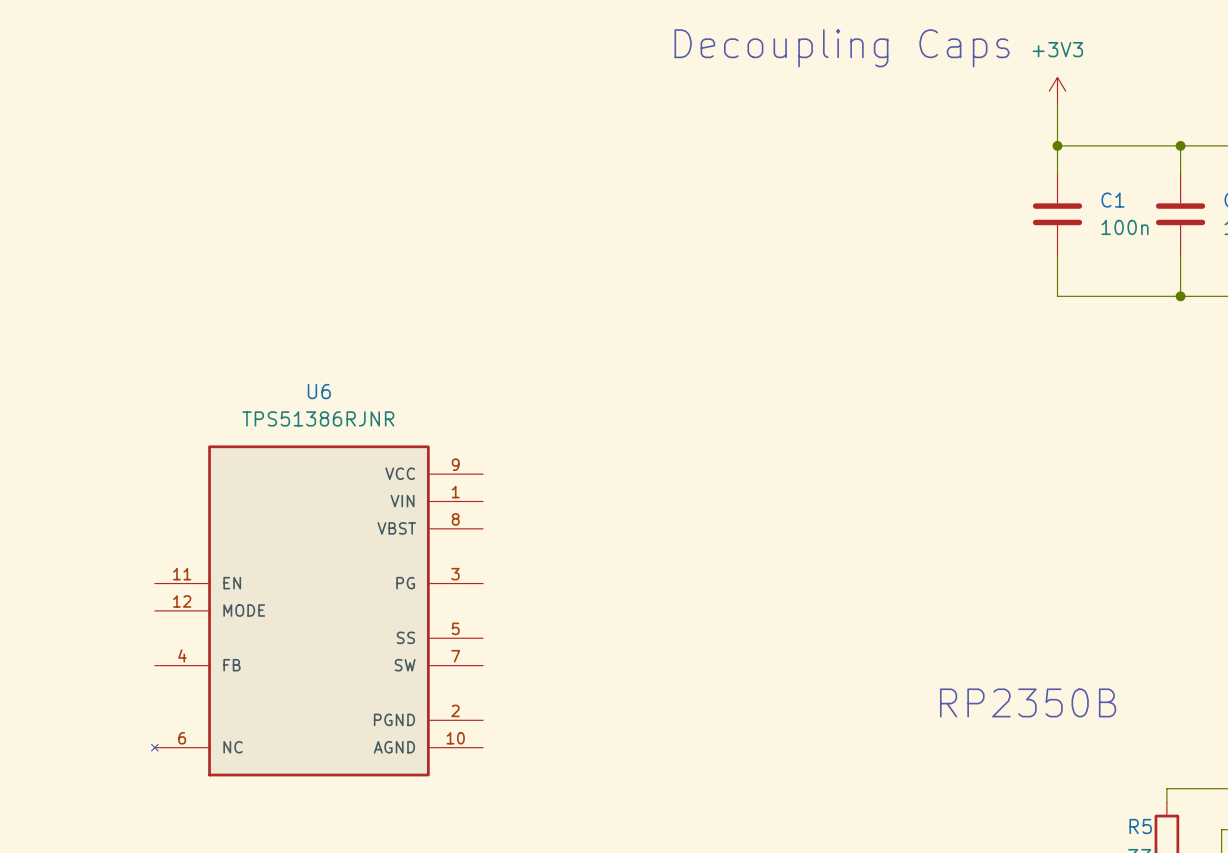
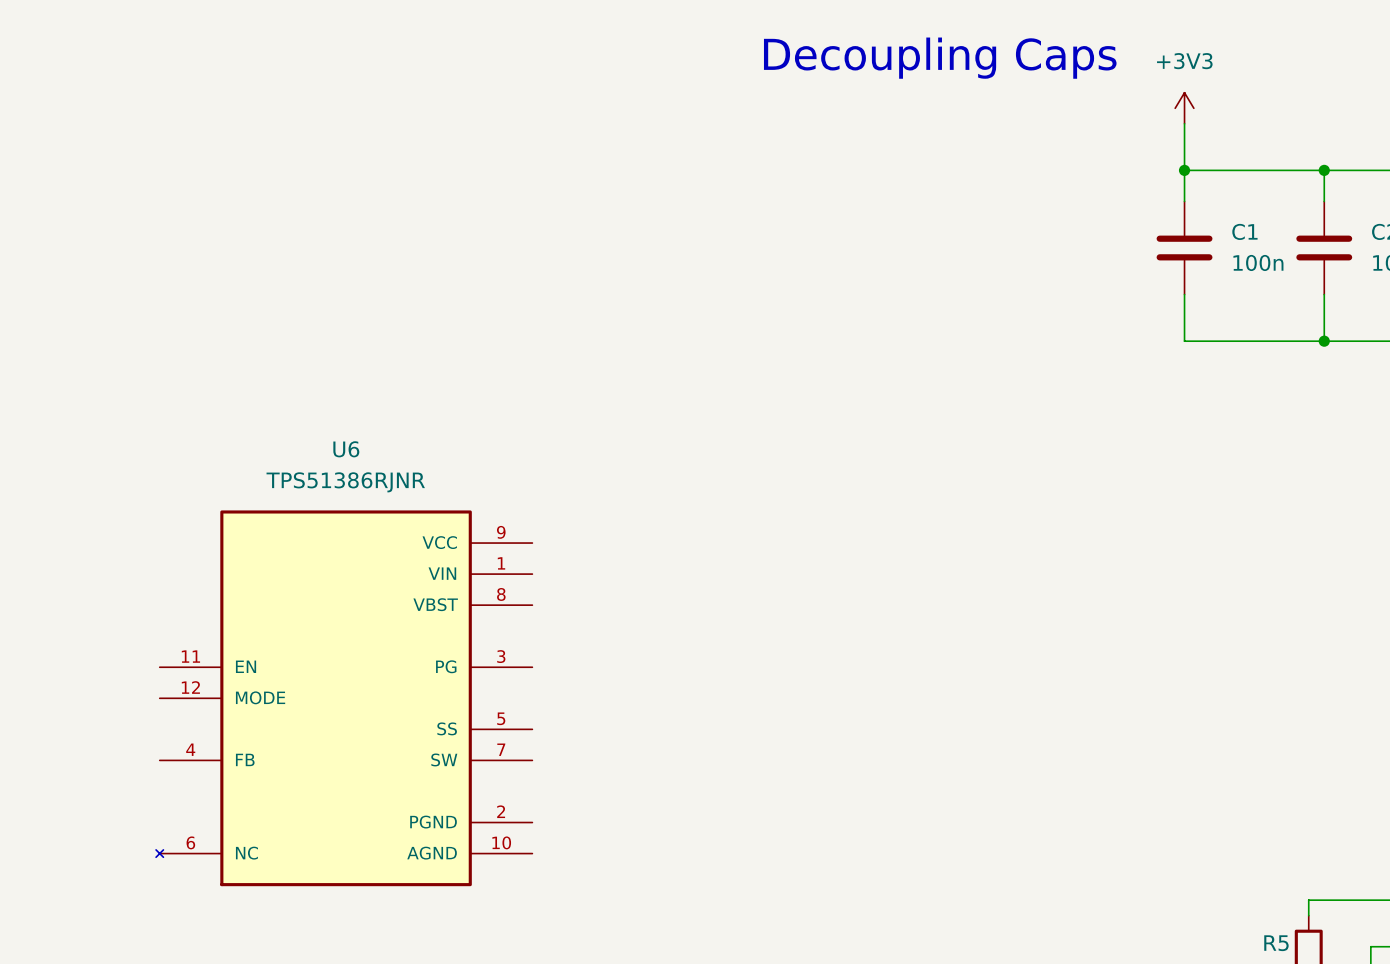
text: RP2350B (1028, 702) -> none

